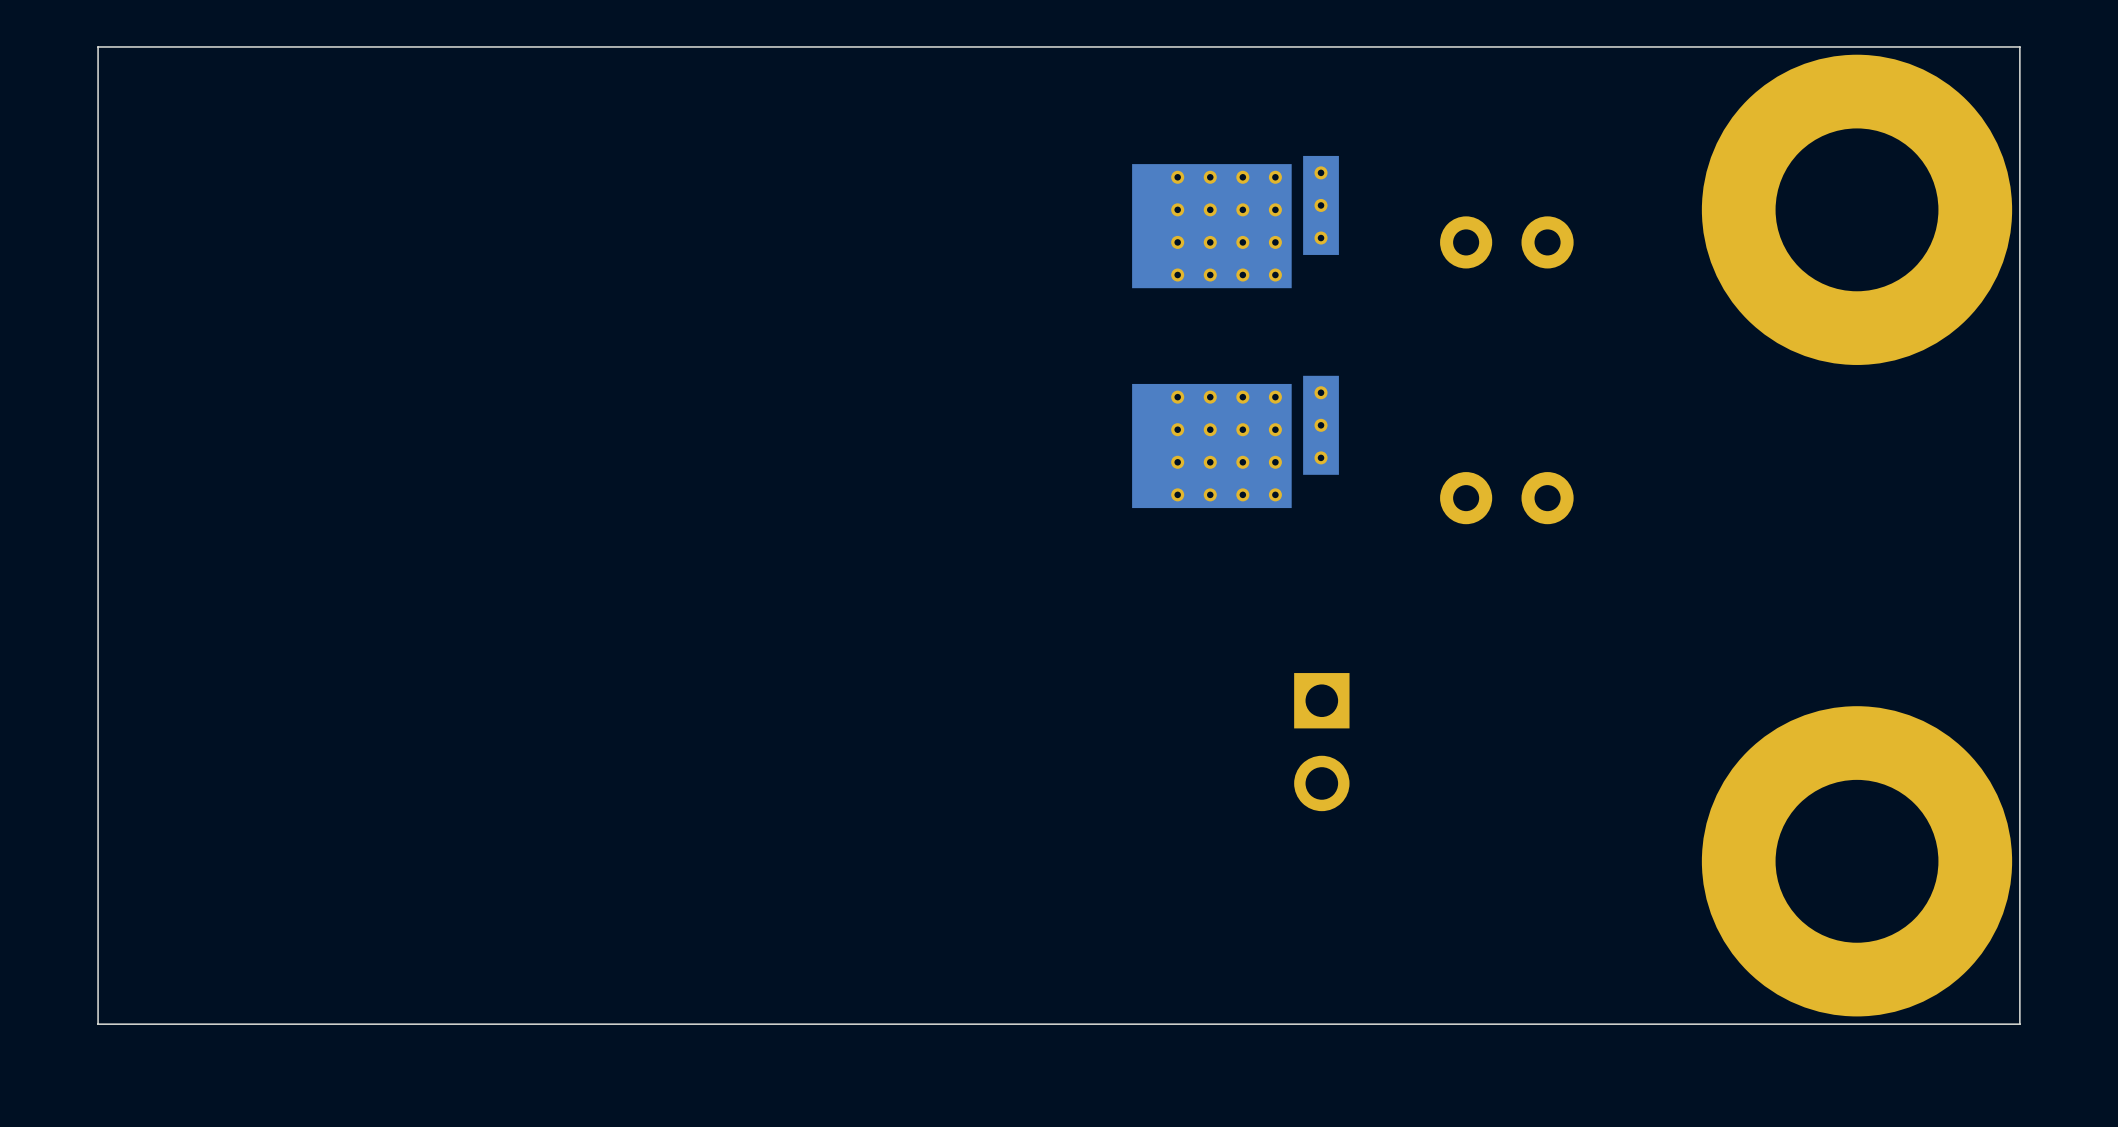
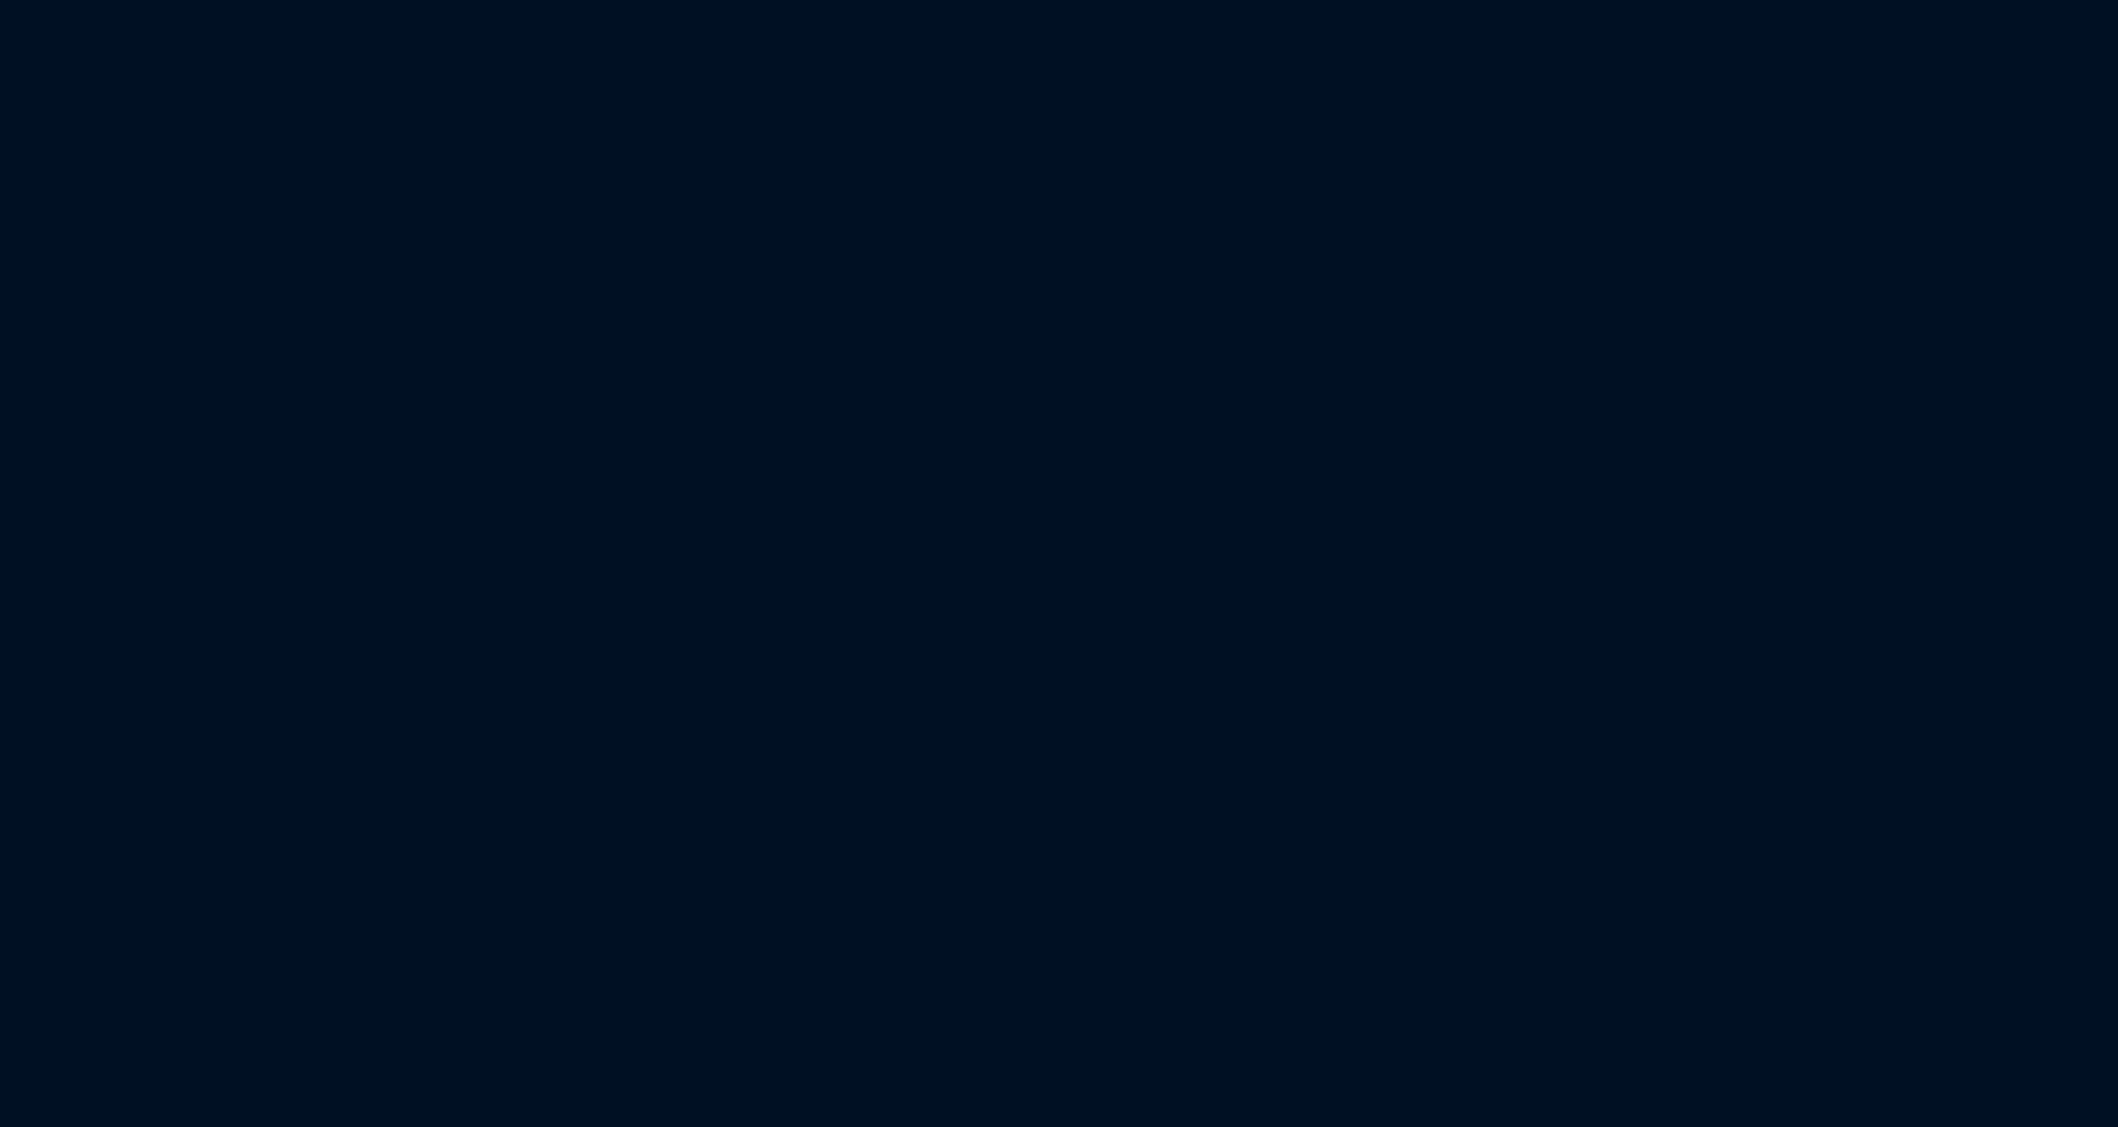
board edge: (2019, 46) (98, 46) (98, 1024) (2019, 1024) (2019, 46) -> none
part: (1857, 209) -> none
part: (1235, 222) -> none
part: (1506, 242) -> none
part: (1235, 441) -> none
part: (1506, 498) -> none
part: (1321, 742) -> none
part: (1857, 861) -> none

